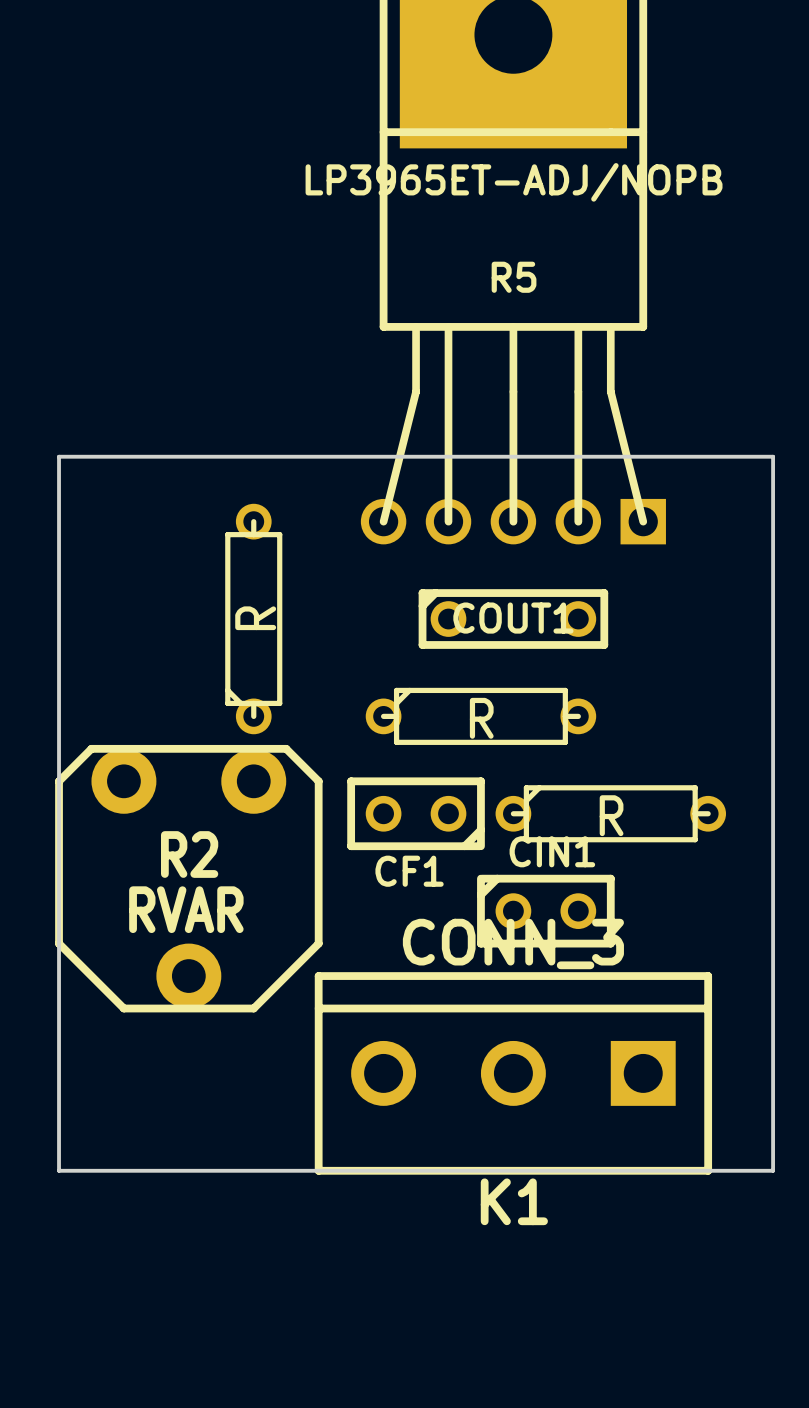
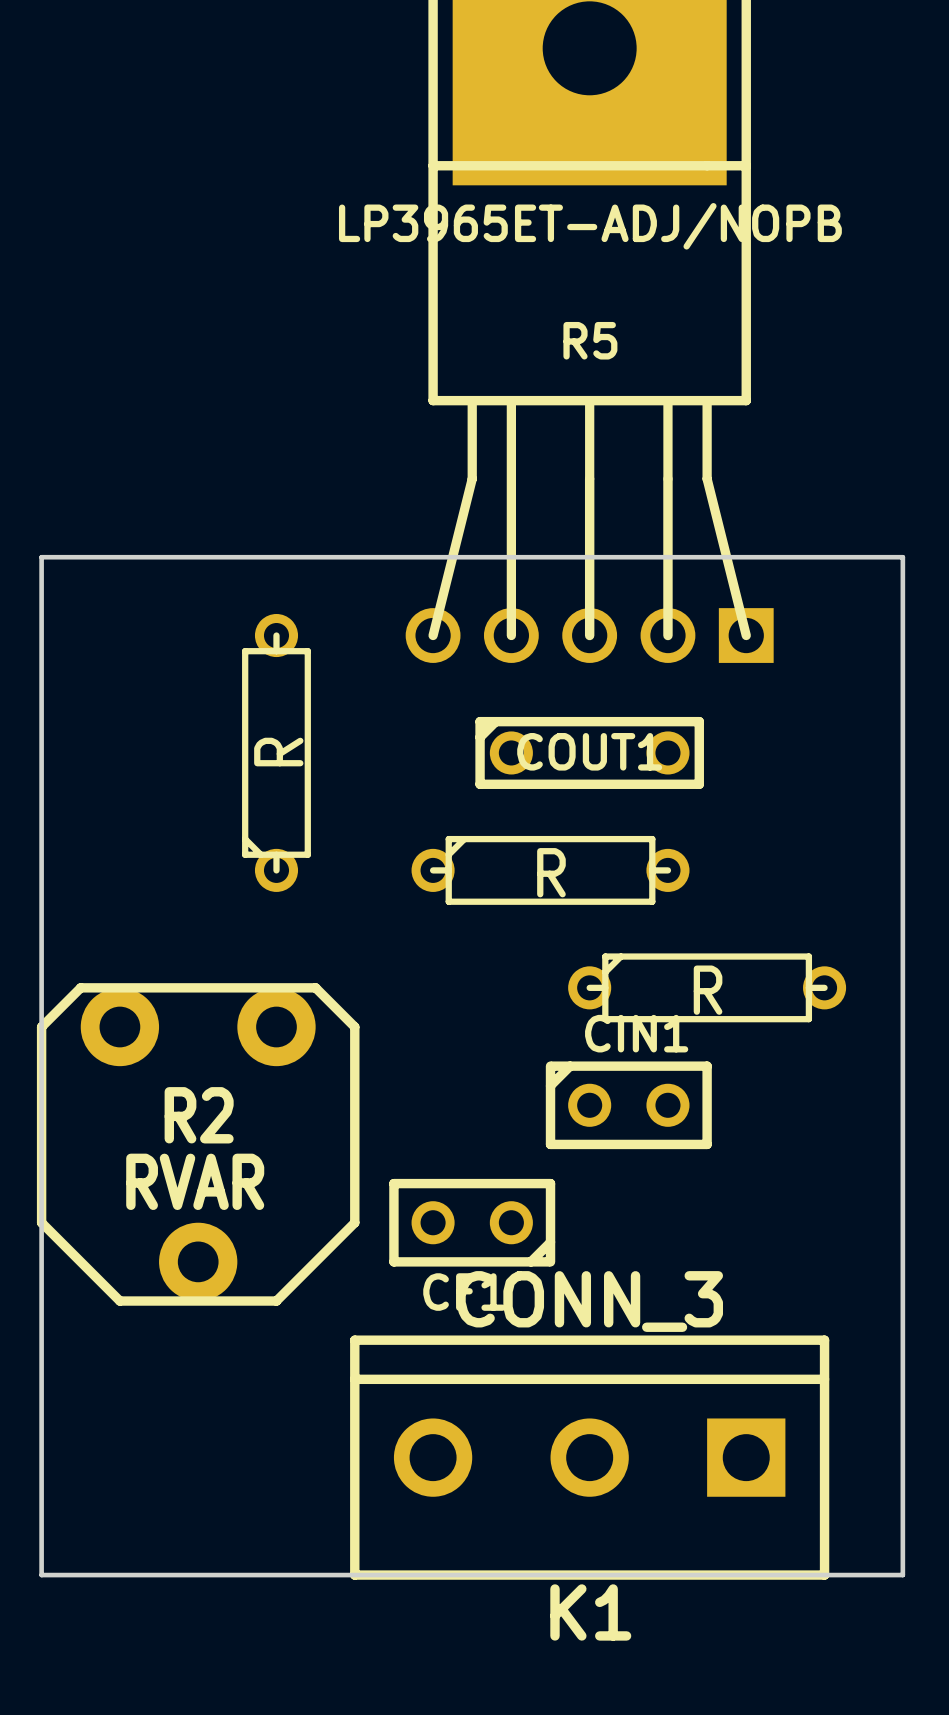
CF1 position: (416, 813) -> (472, 1222)
R2 position: (188, 878) -> (198, 1144)
K1 position: (513, 1073) -> (589, 1457)
board edge: (59, 1170) (773, 1170) -> (41, 1418) (41, 1575) (902, 1575) (902, 1418)

